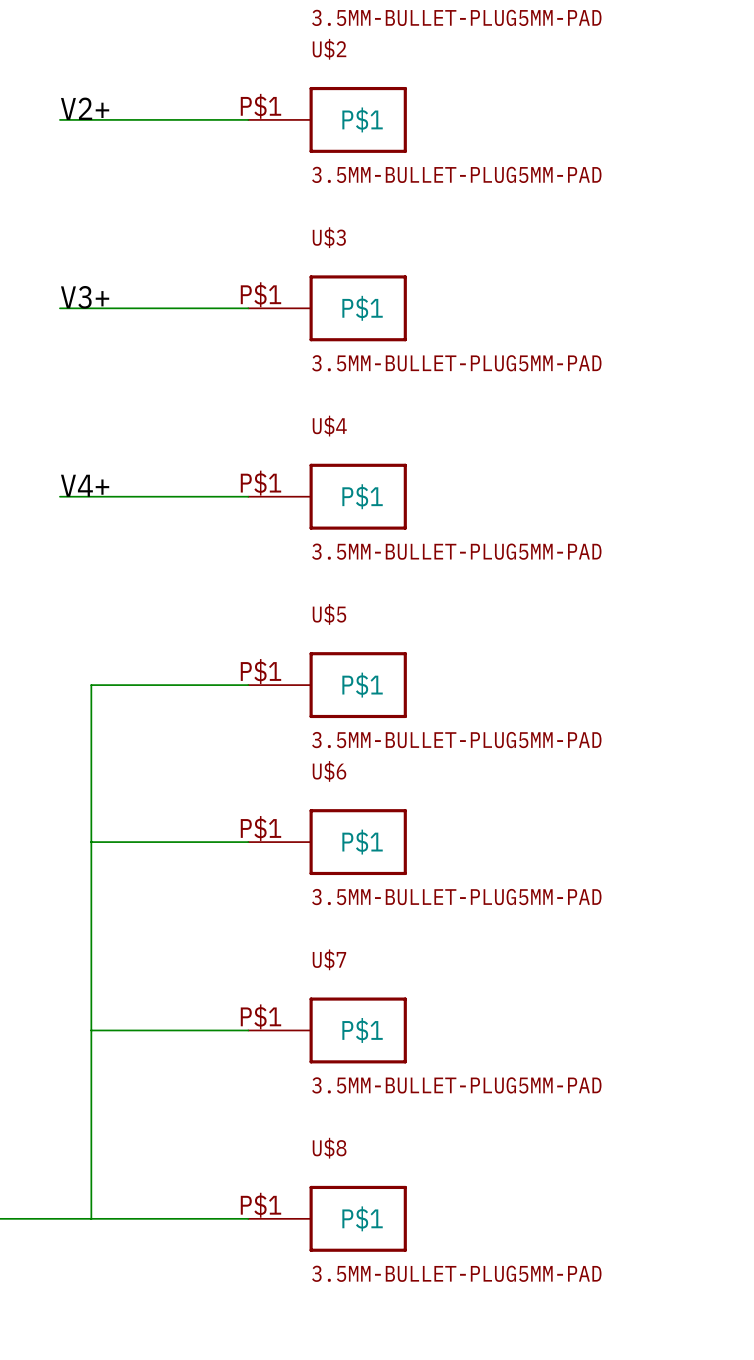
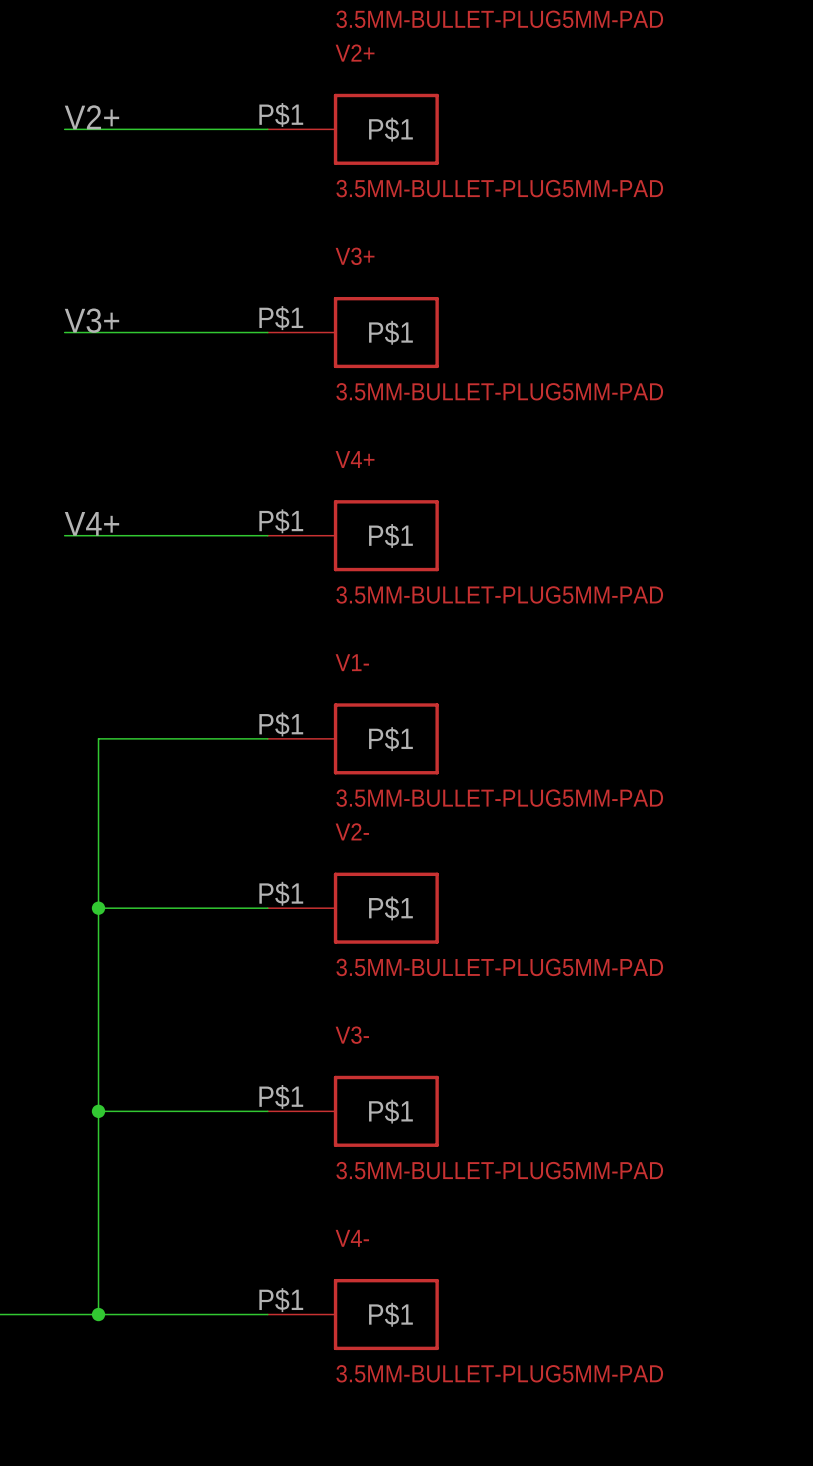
U$2 name: U$2 (329, 49) -> V2+ (355, 53)
U$3 name: U$3 (329, 237) -> V3+ (355, 256)
U$4 name: U$4 (329, 426) -> V4+ (355, 459)
U$5 name: U$5 (329, 614) -> V1- (352, 662)
U$6 name: U$6 (329, 771) -> V2- (352, 831)
junction: none -> (98, 908)
U$7 name: U$7 (329, 959) -> V3- (352, 1035)
junction: none -> (98, 1111)
U$8 name: U$8 (329, 1148) -> V4- (352, 1238)
junction: none -> (98, 1314)

